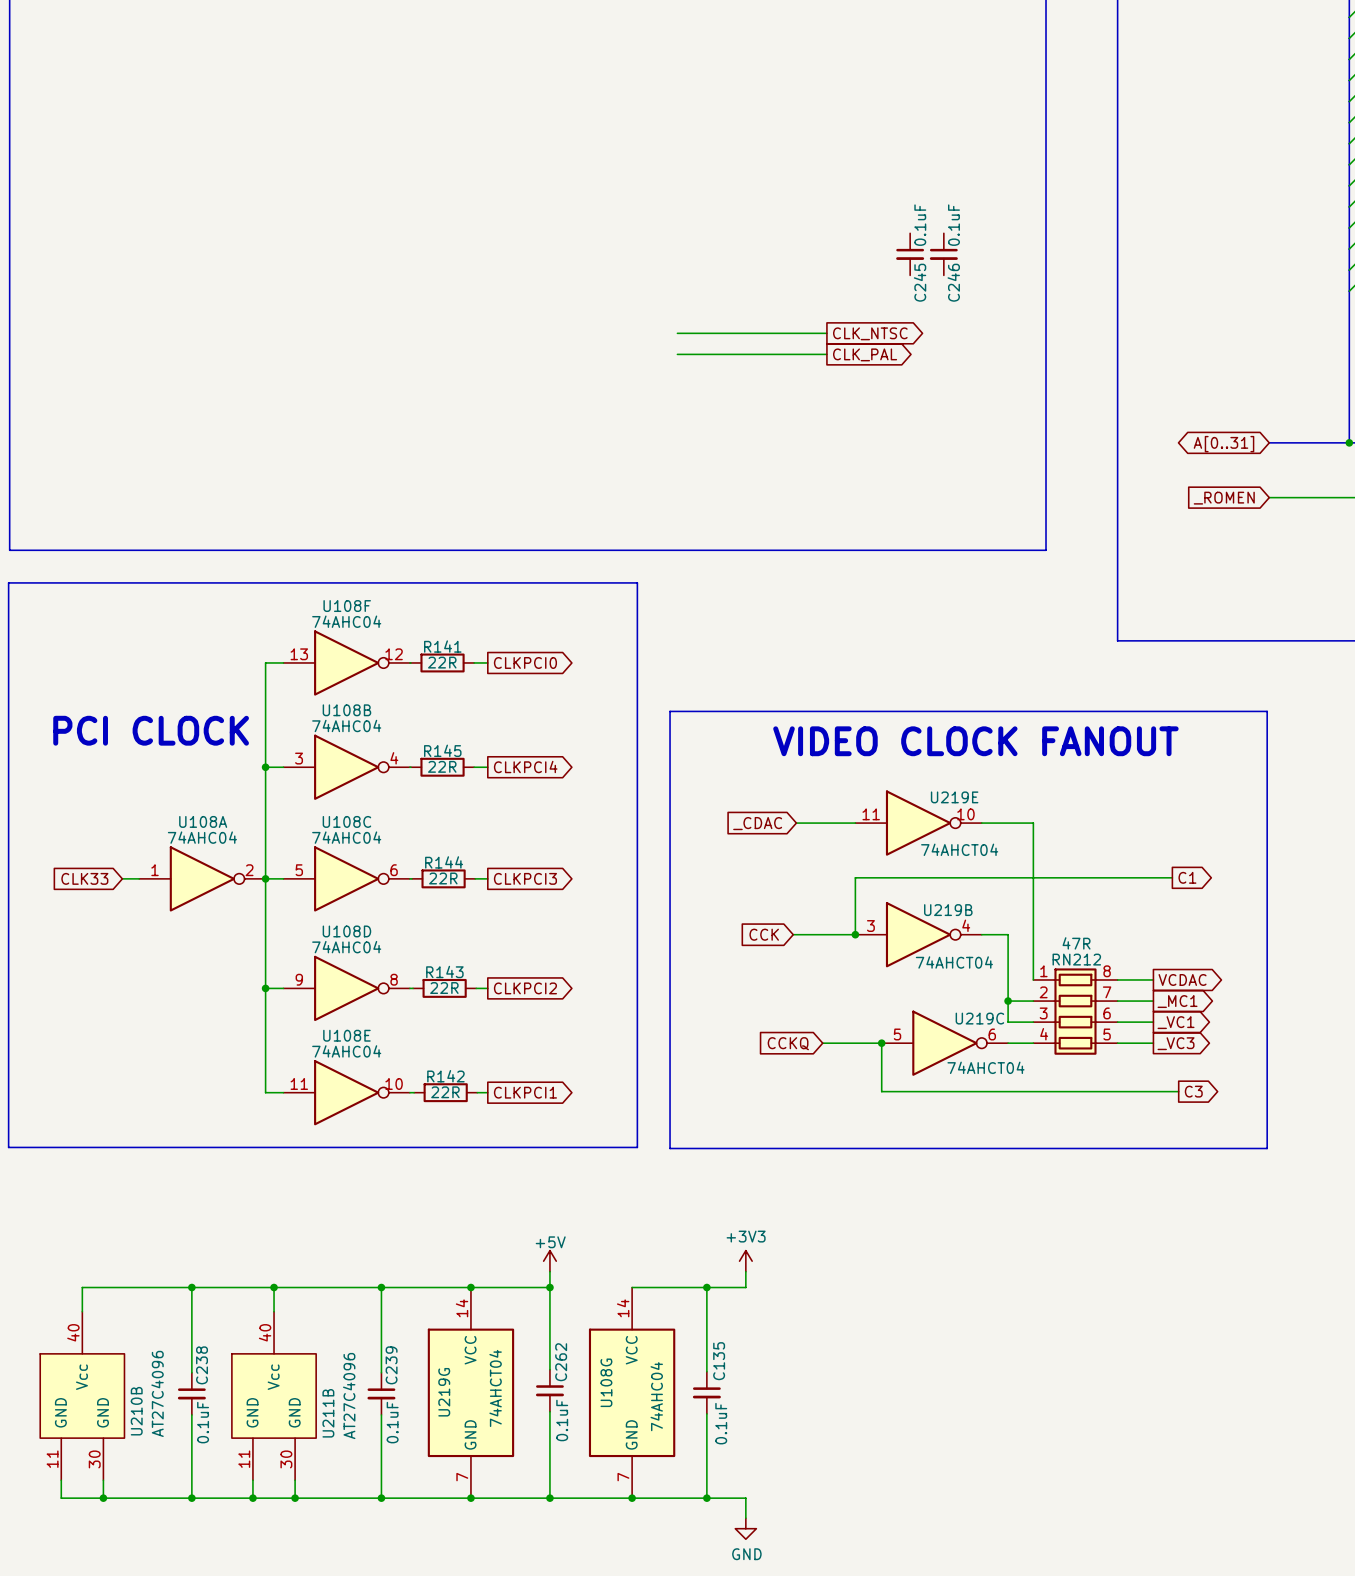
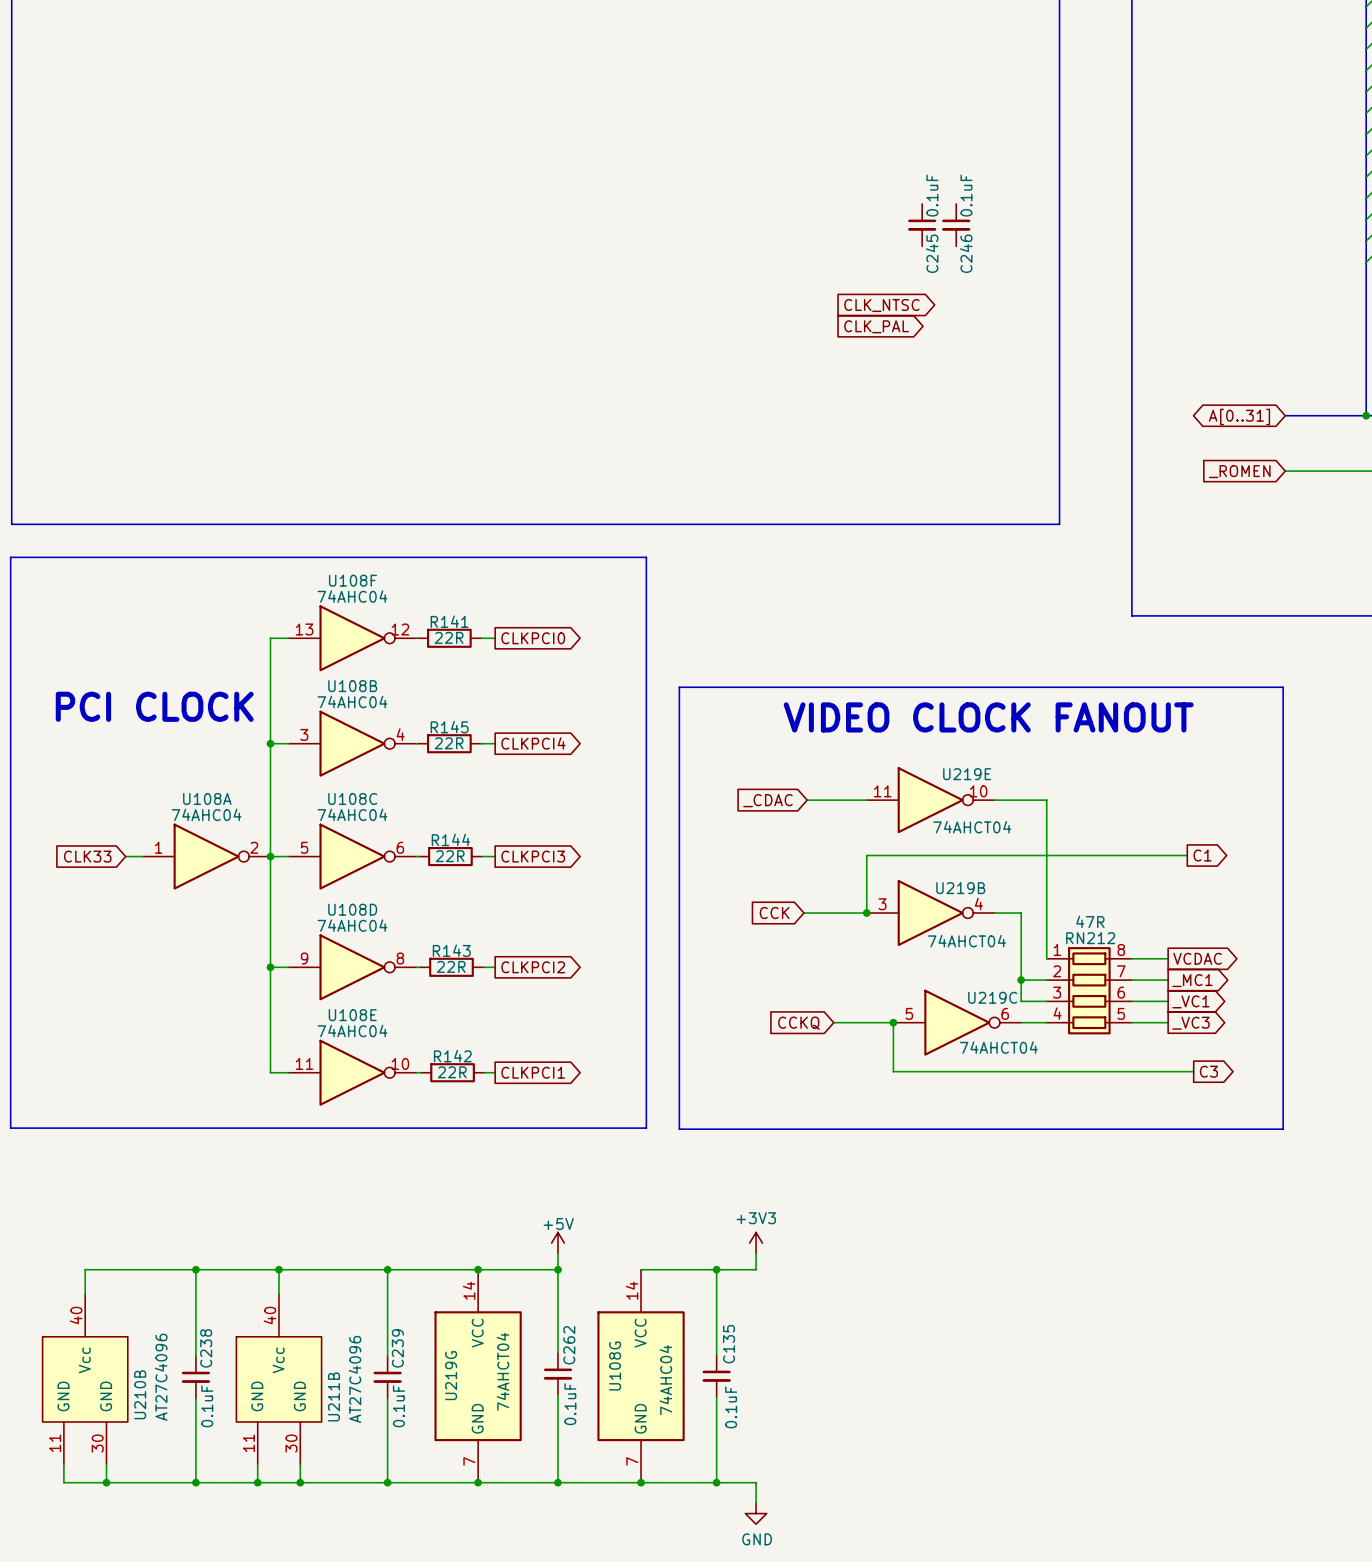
wire: (677, 333) (826, 333) -> none
wire: (677, 354) (826, 354) -> none

